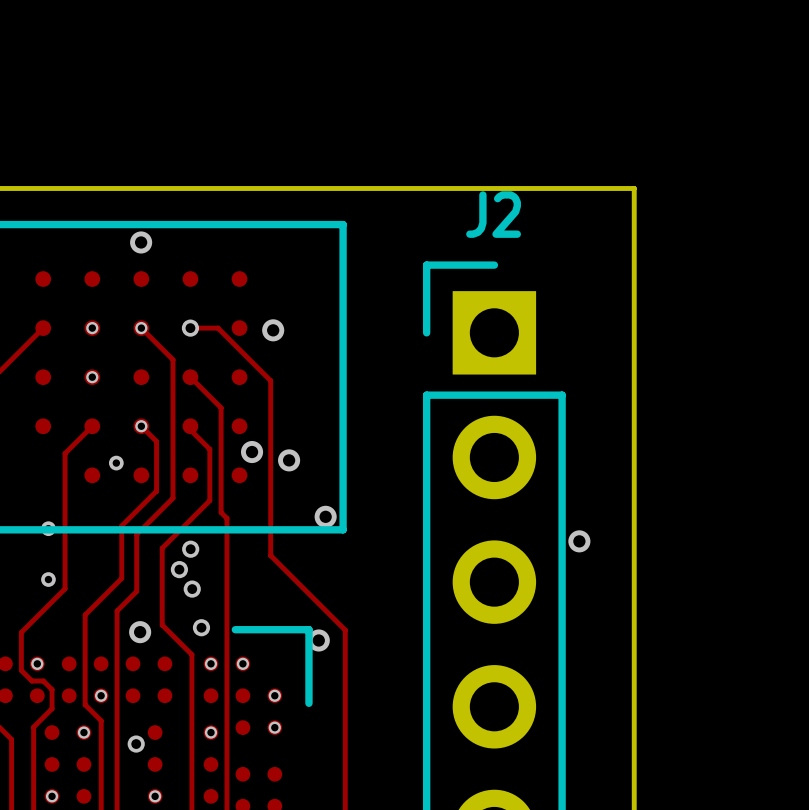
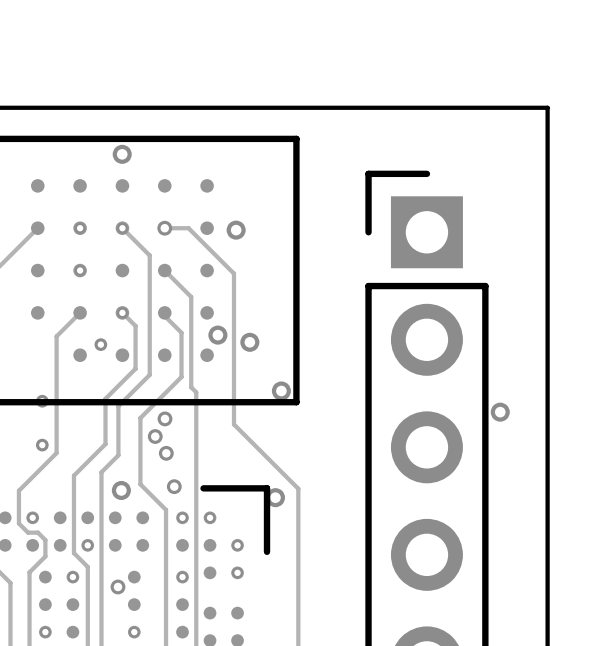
J2 name: J2 (493, 214) -> none

